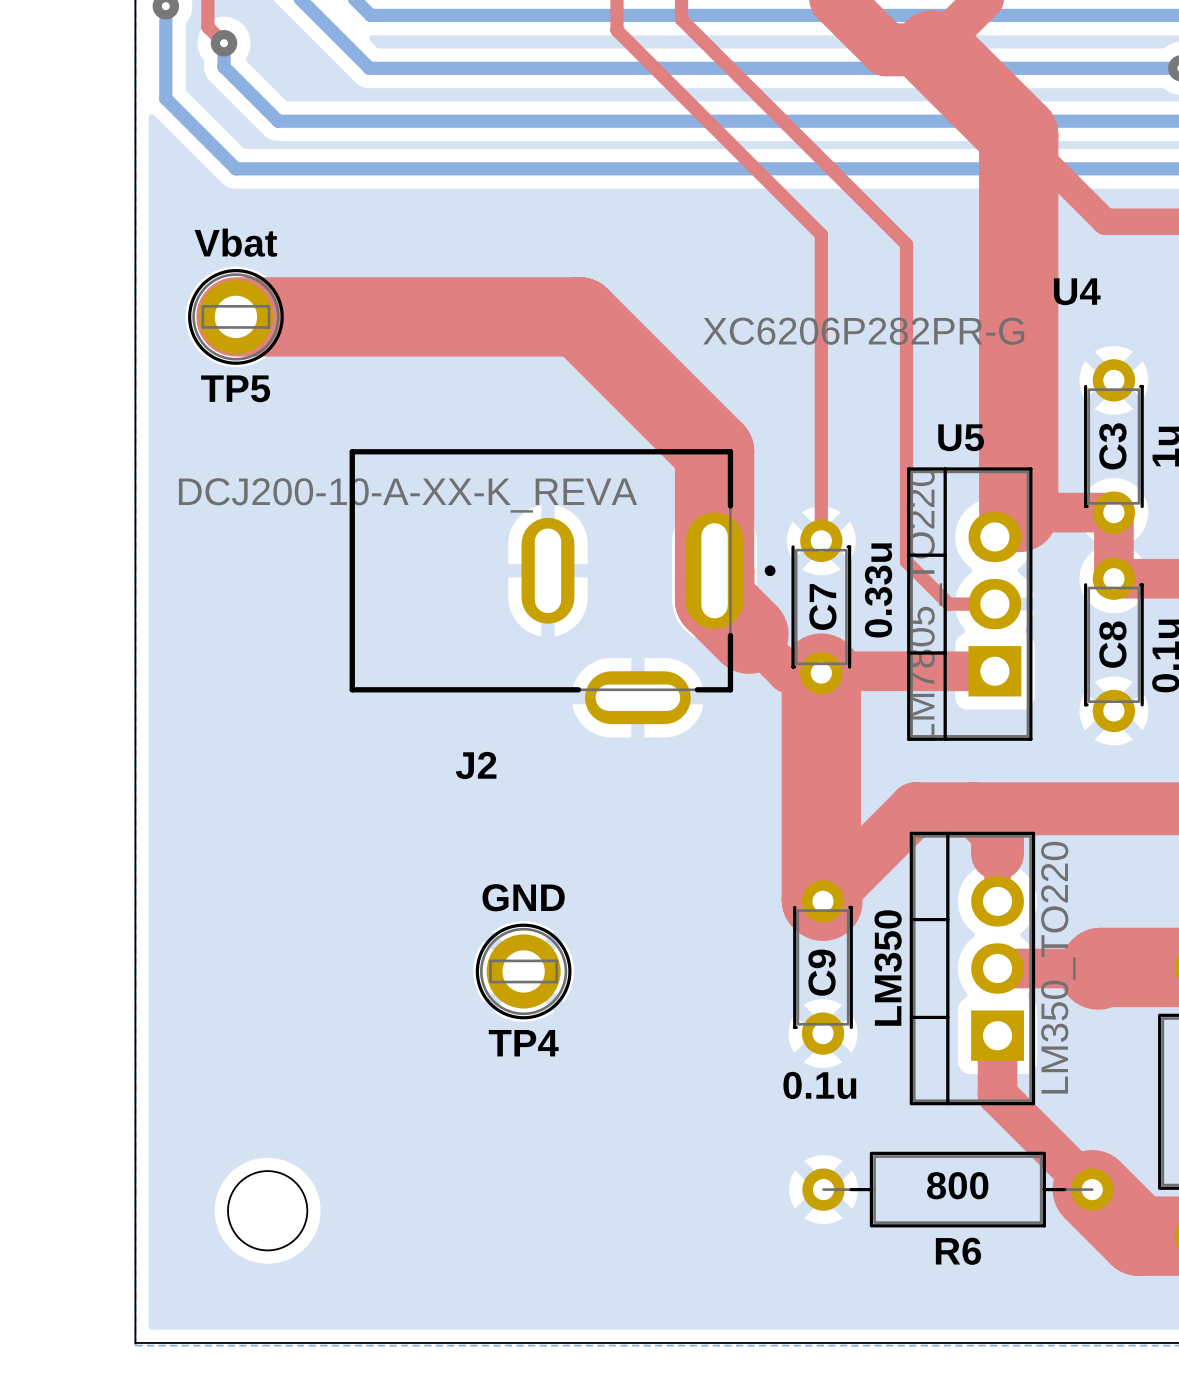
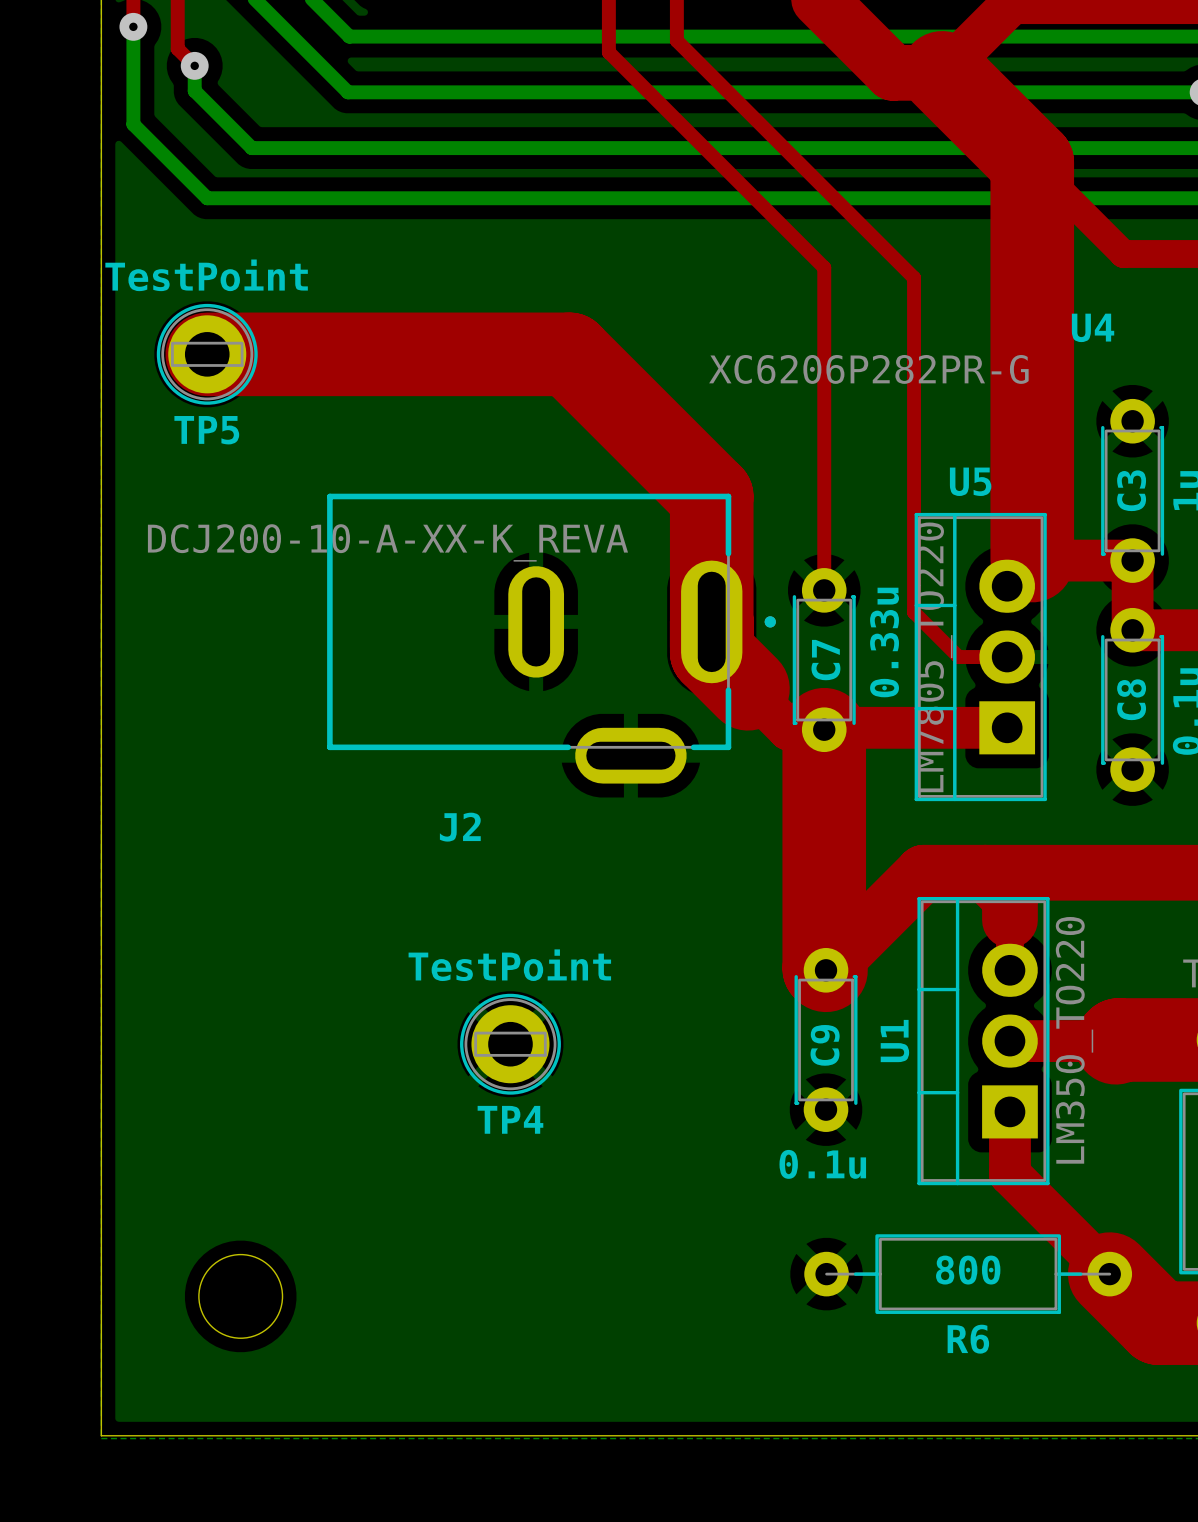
TP5 value: Vbat (235, 242) -> TestPoint (206, 275)
TP4 value: GND (523, 897) -> TestPoint (509, 965)
LM350 name: LM350 (888, 968) -> U1 (894, 1041)

